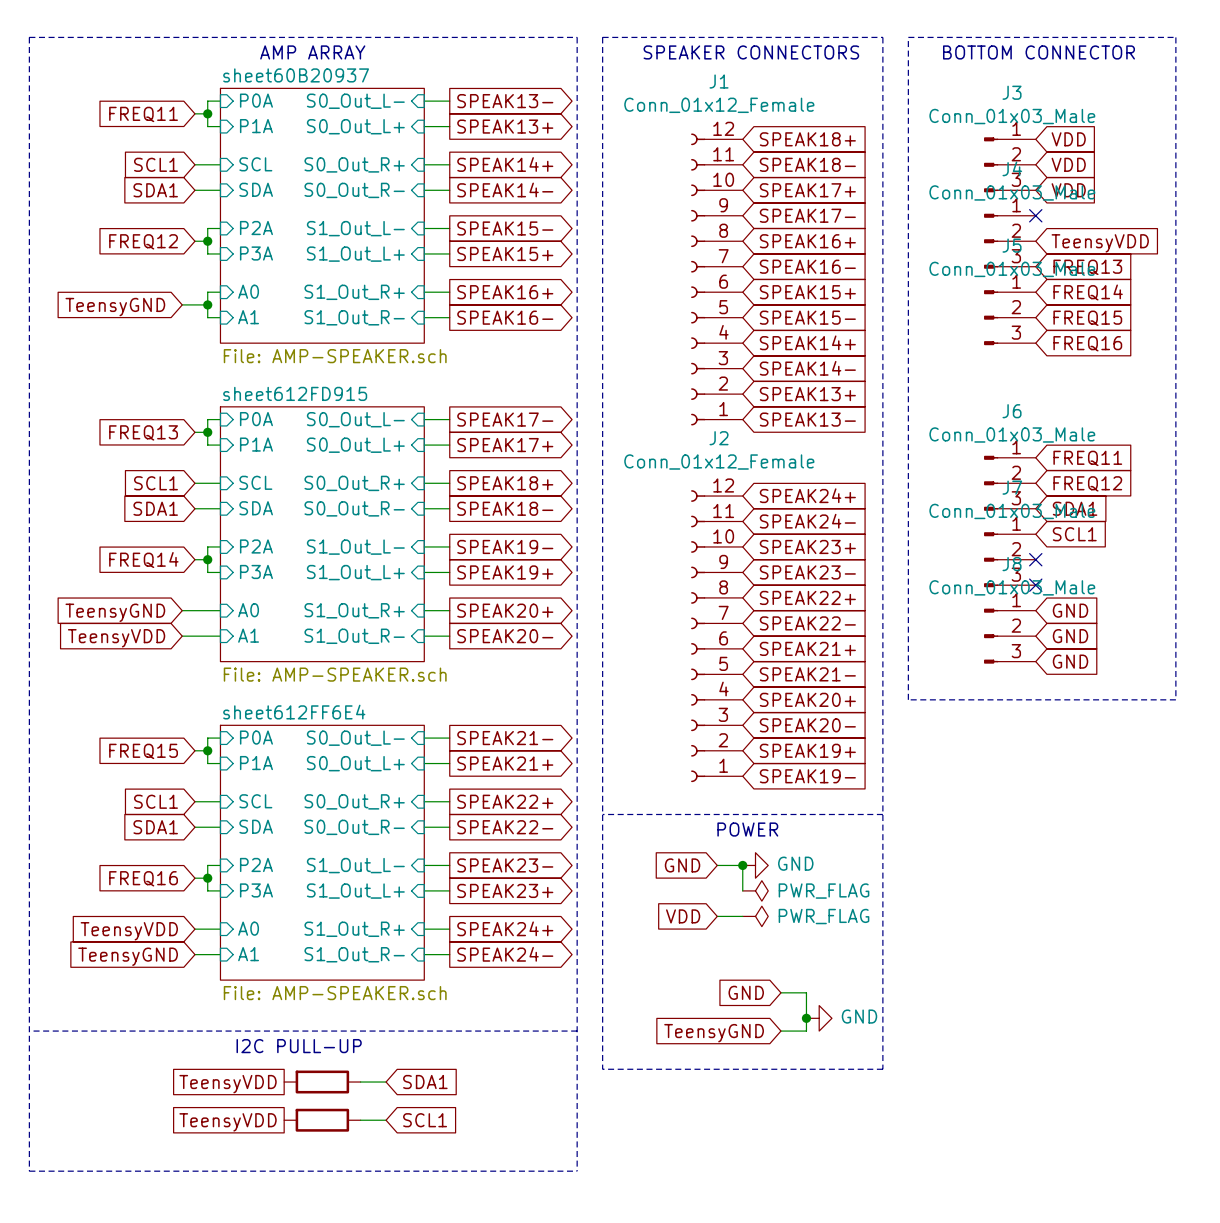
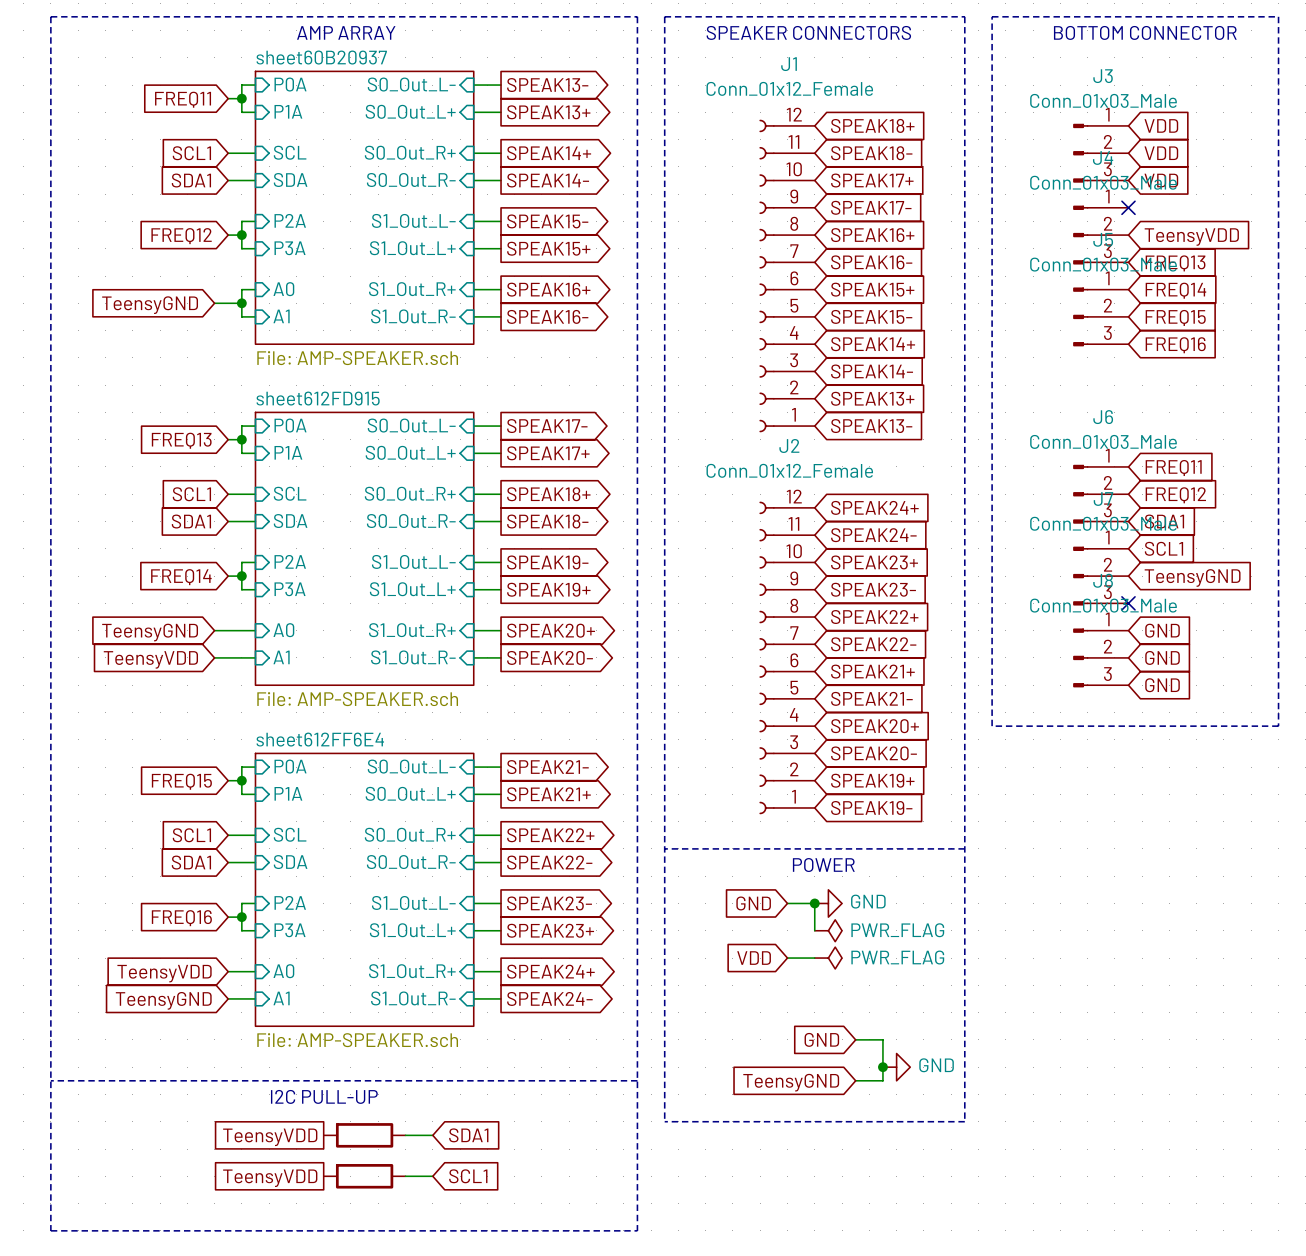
no-connect mark: (1035, 559) -> none
global label: none -> TeensyGND (1192, 577)

